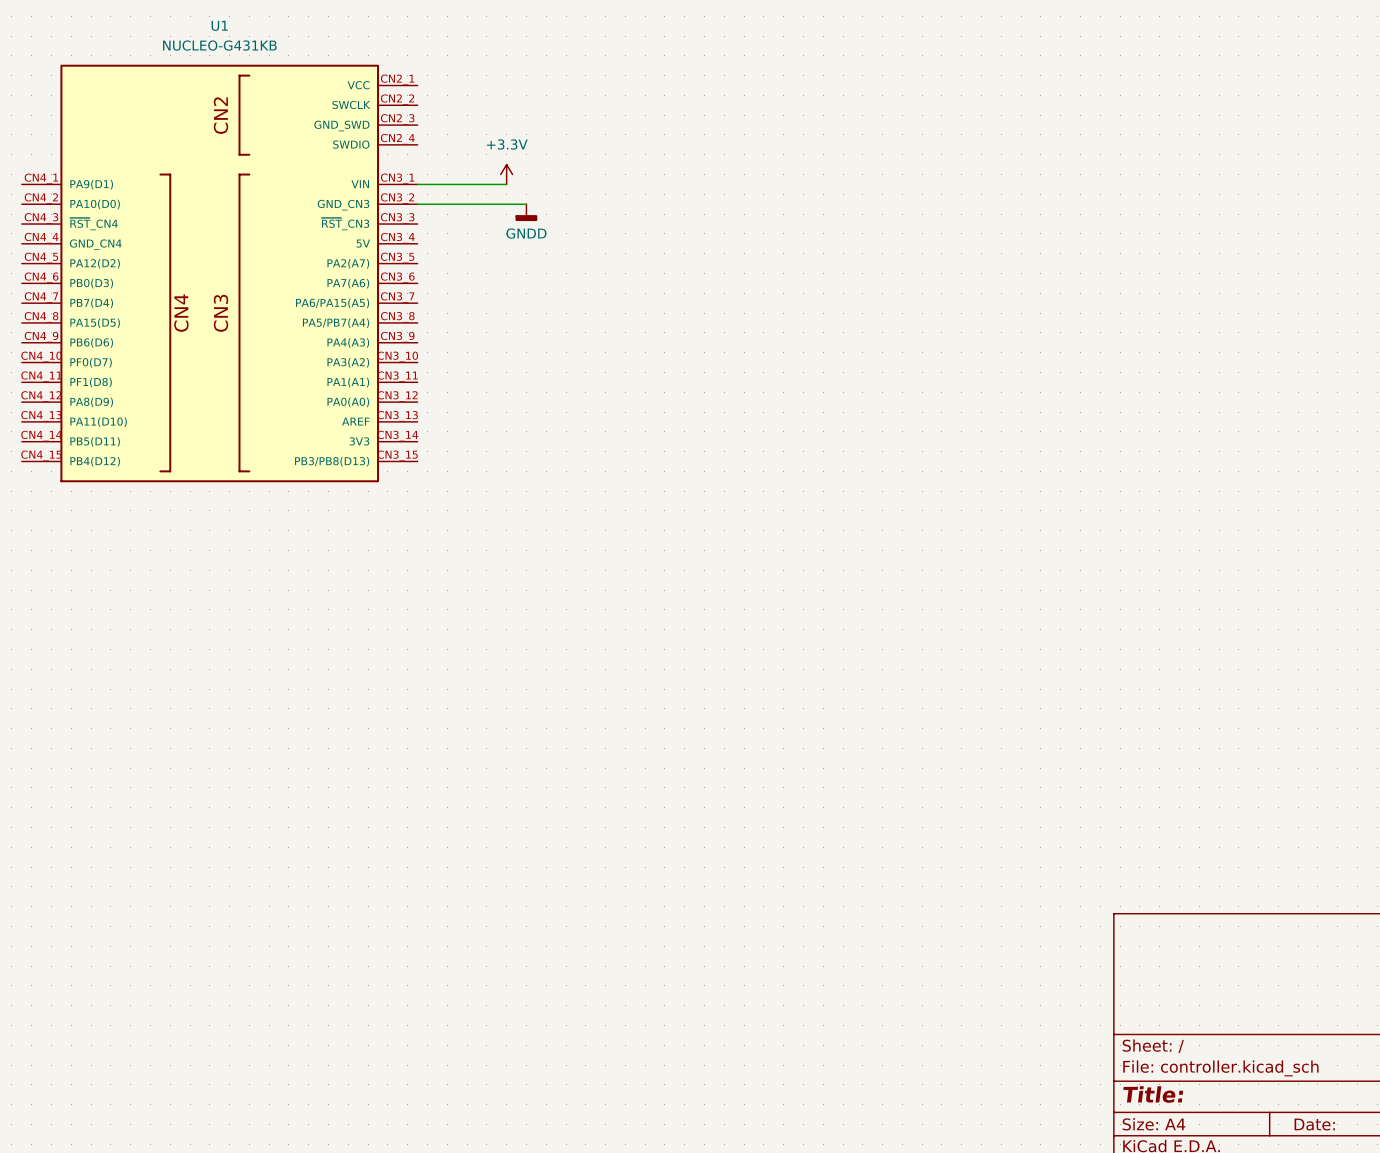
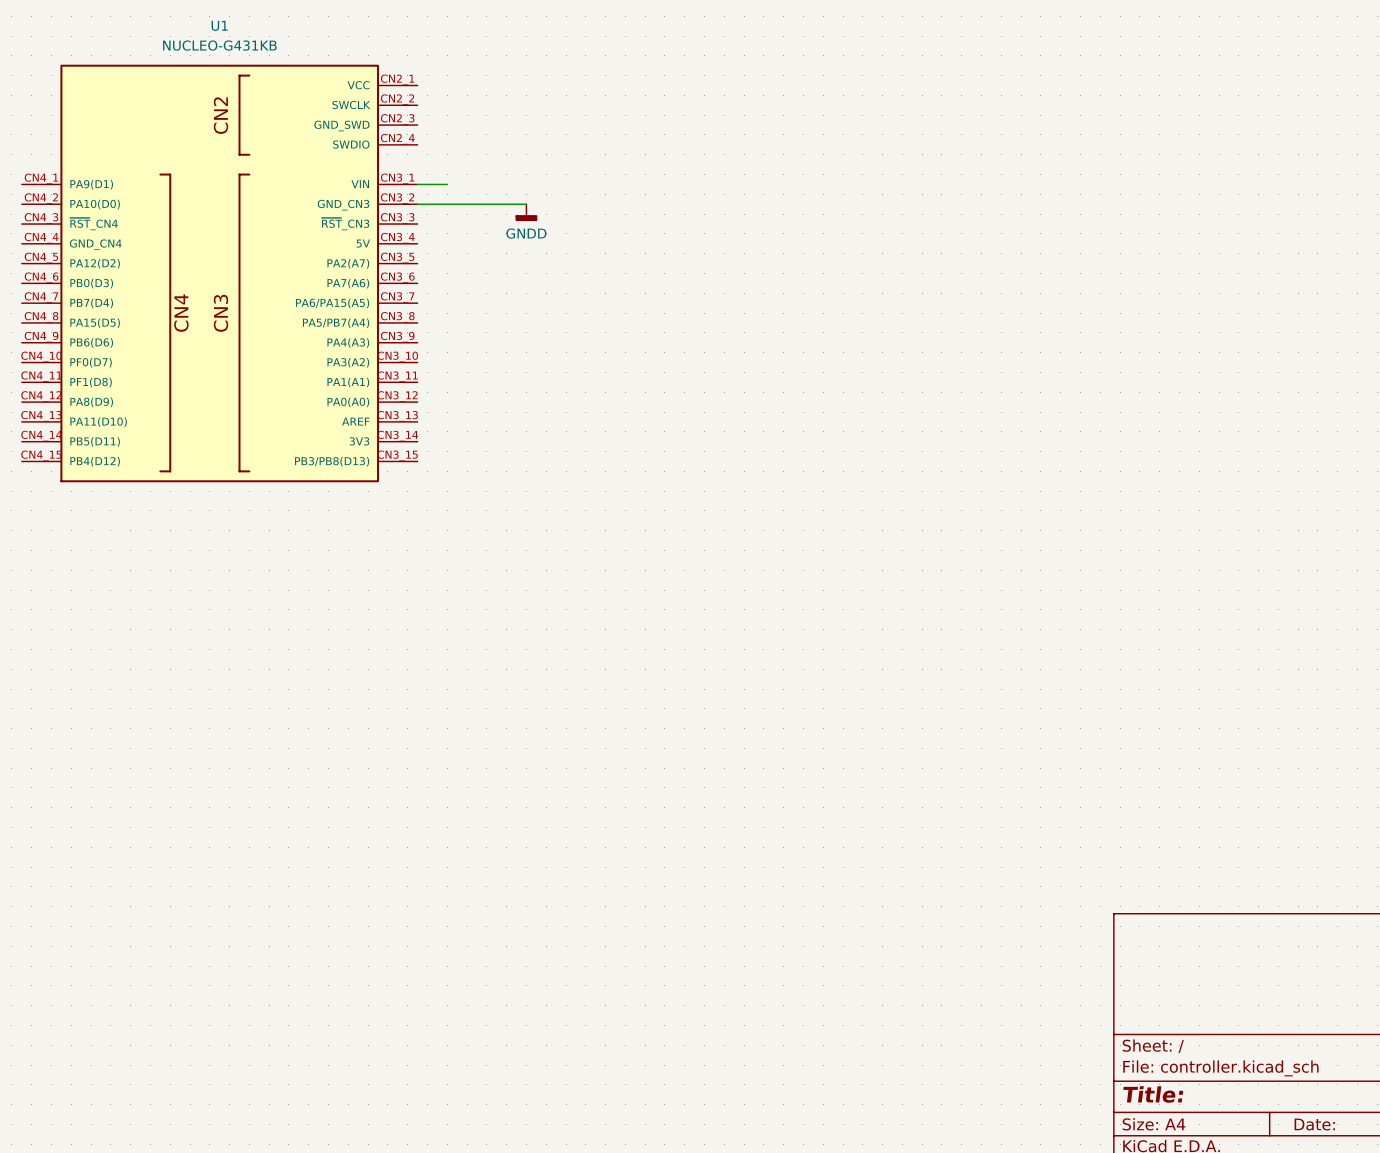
power symbol: +3.3V (506, 174) -> none
wire: (447, 184) (506, 184) -> none

